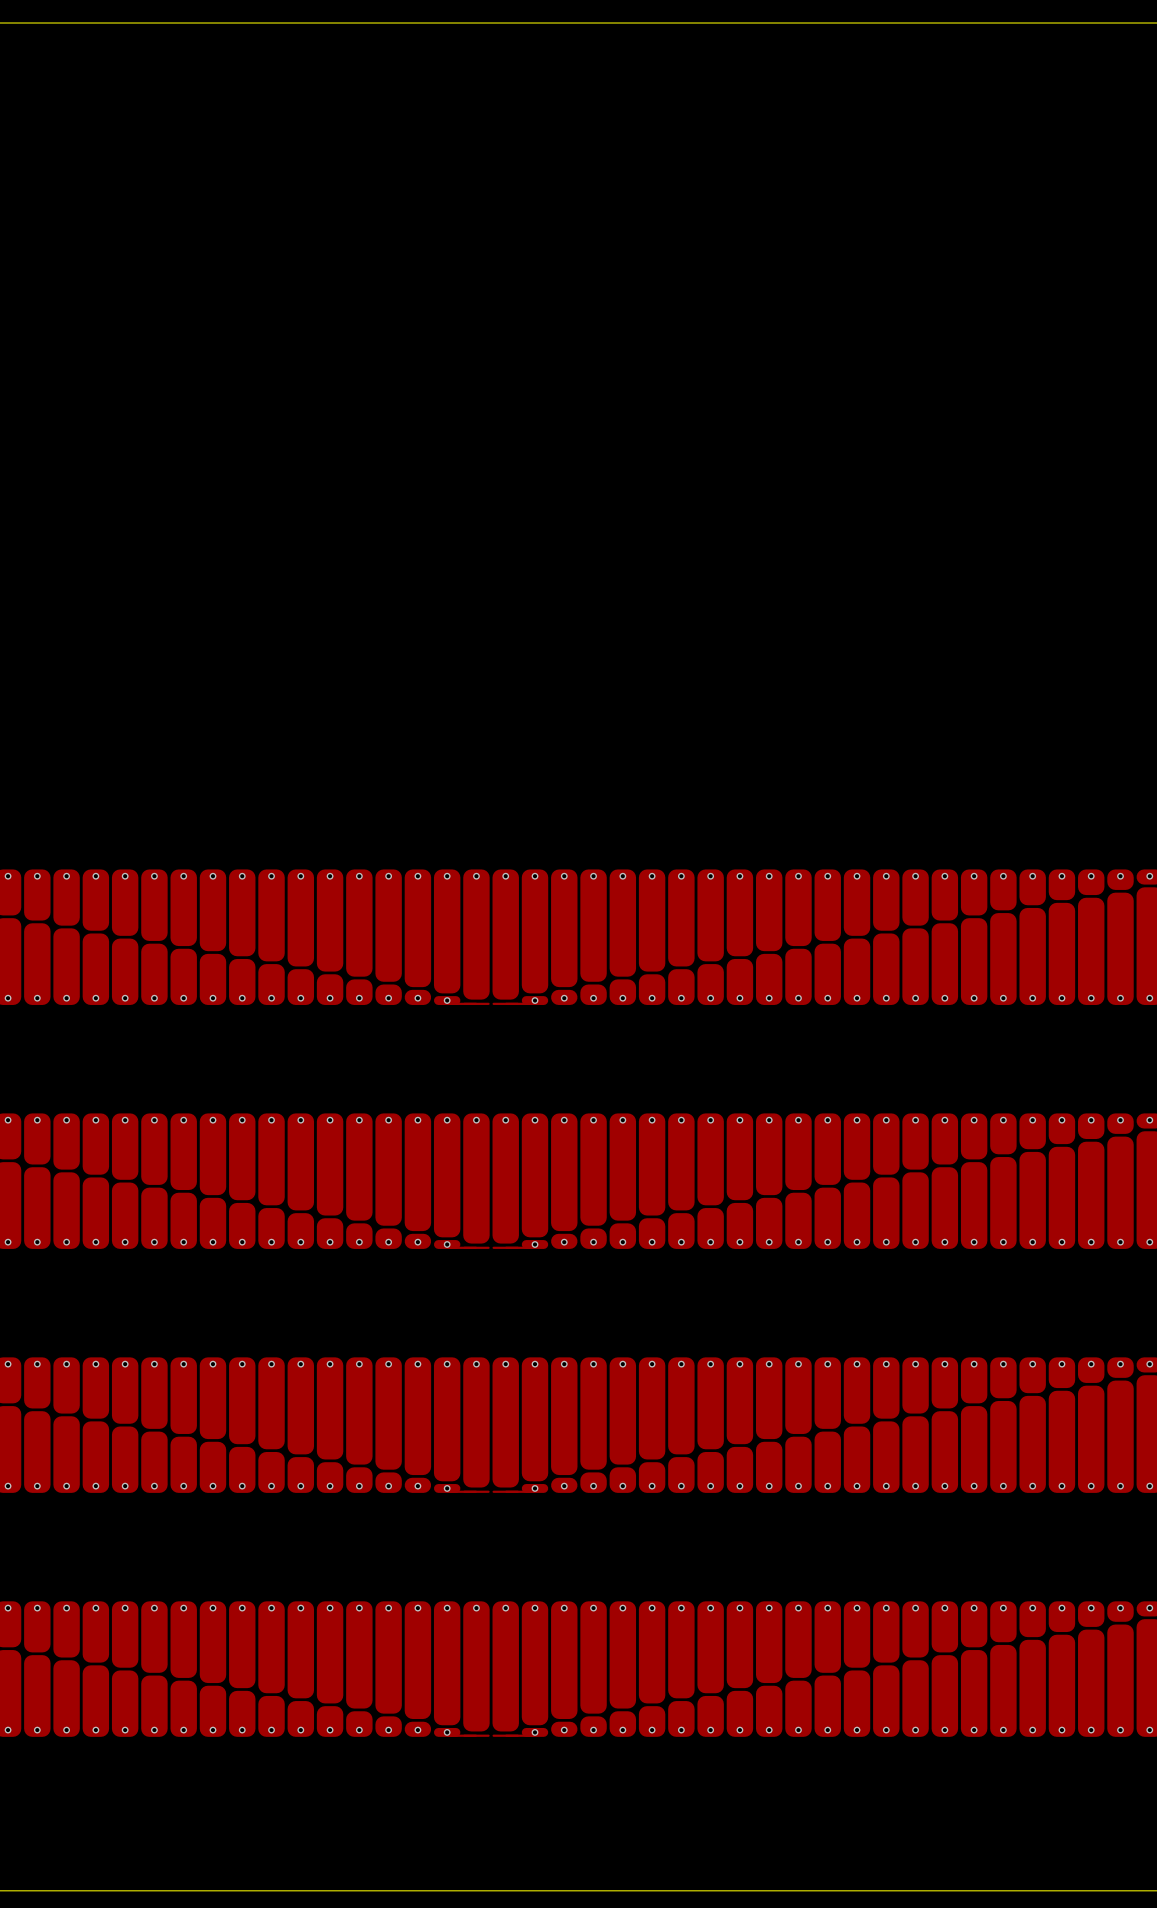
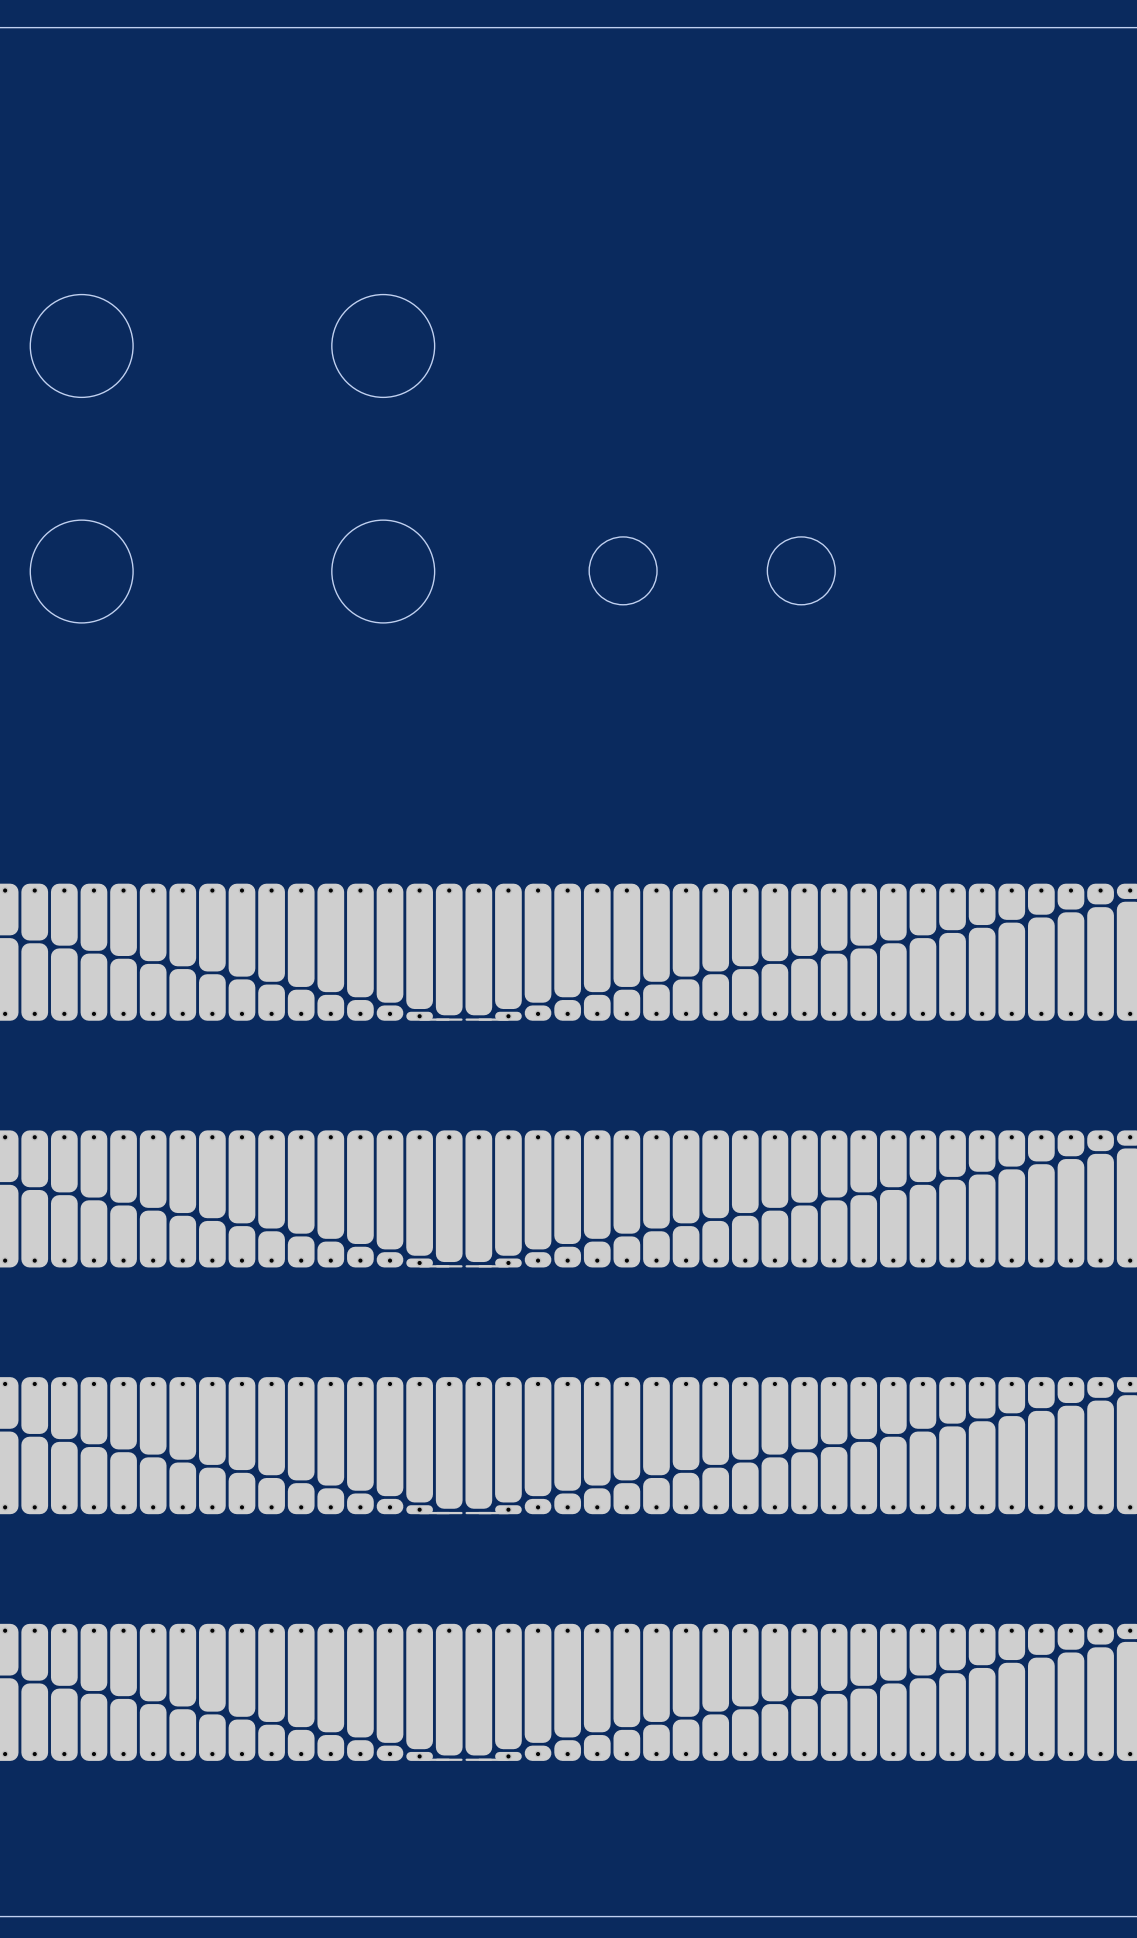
round board edge: none -> [29, 293, 134, 399]
round board edge: none -> [331, 293, 436, 399]
round board edge: none -> [29, 519, 134, 624]
round board edge: none -> [331, 519, 436, 624]
round board edge: none -> [588, 536, 658, 606]
round board edge: none -> [766, 536, 836, 606]

